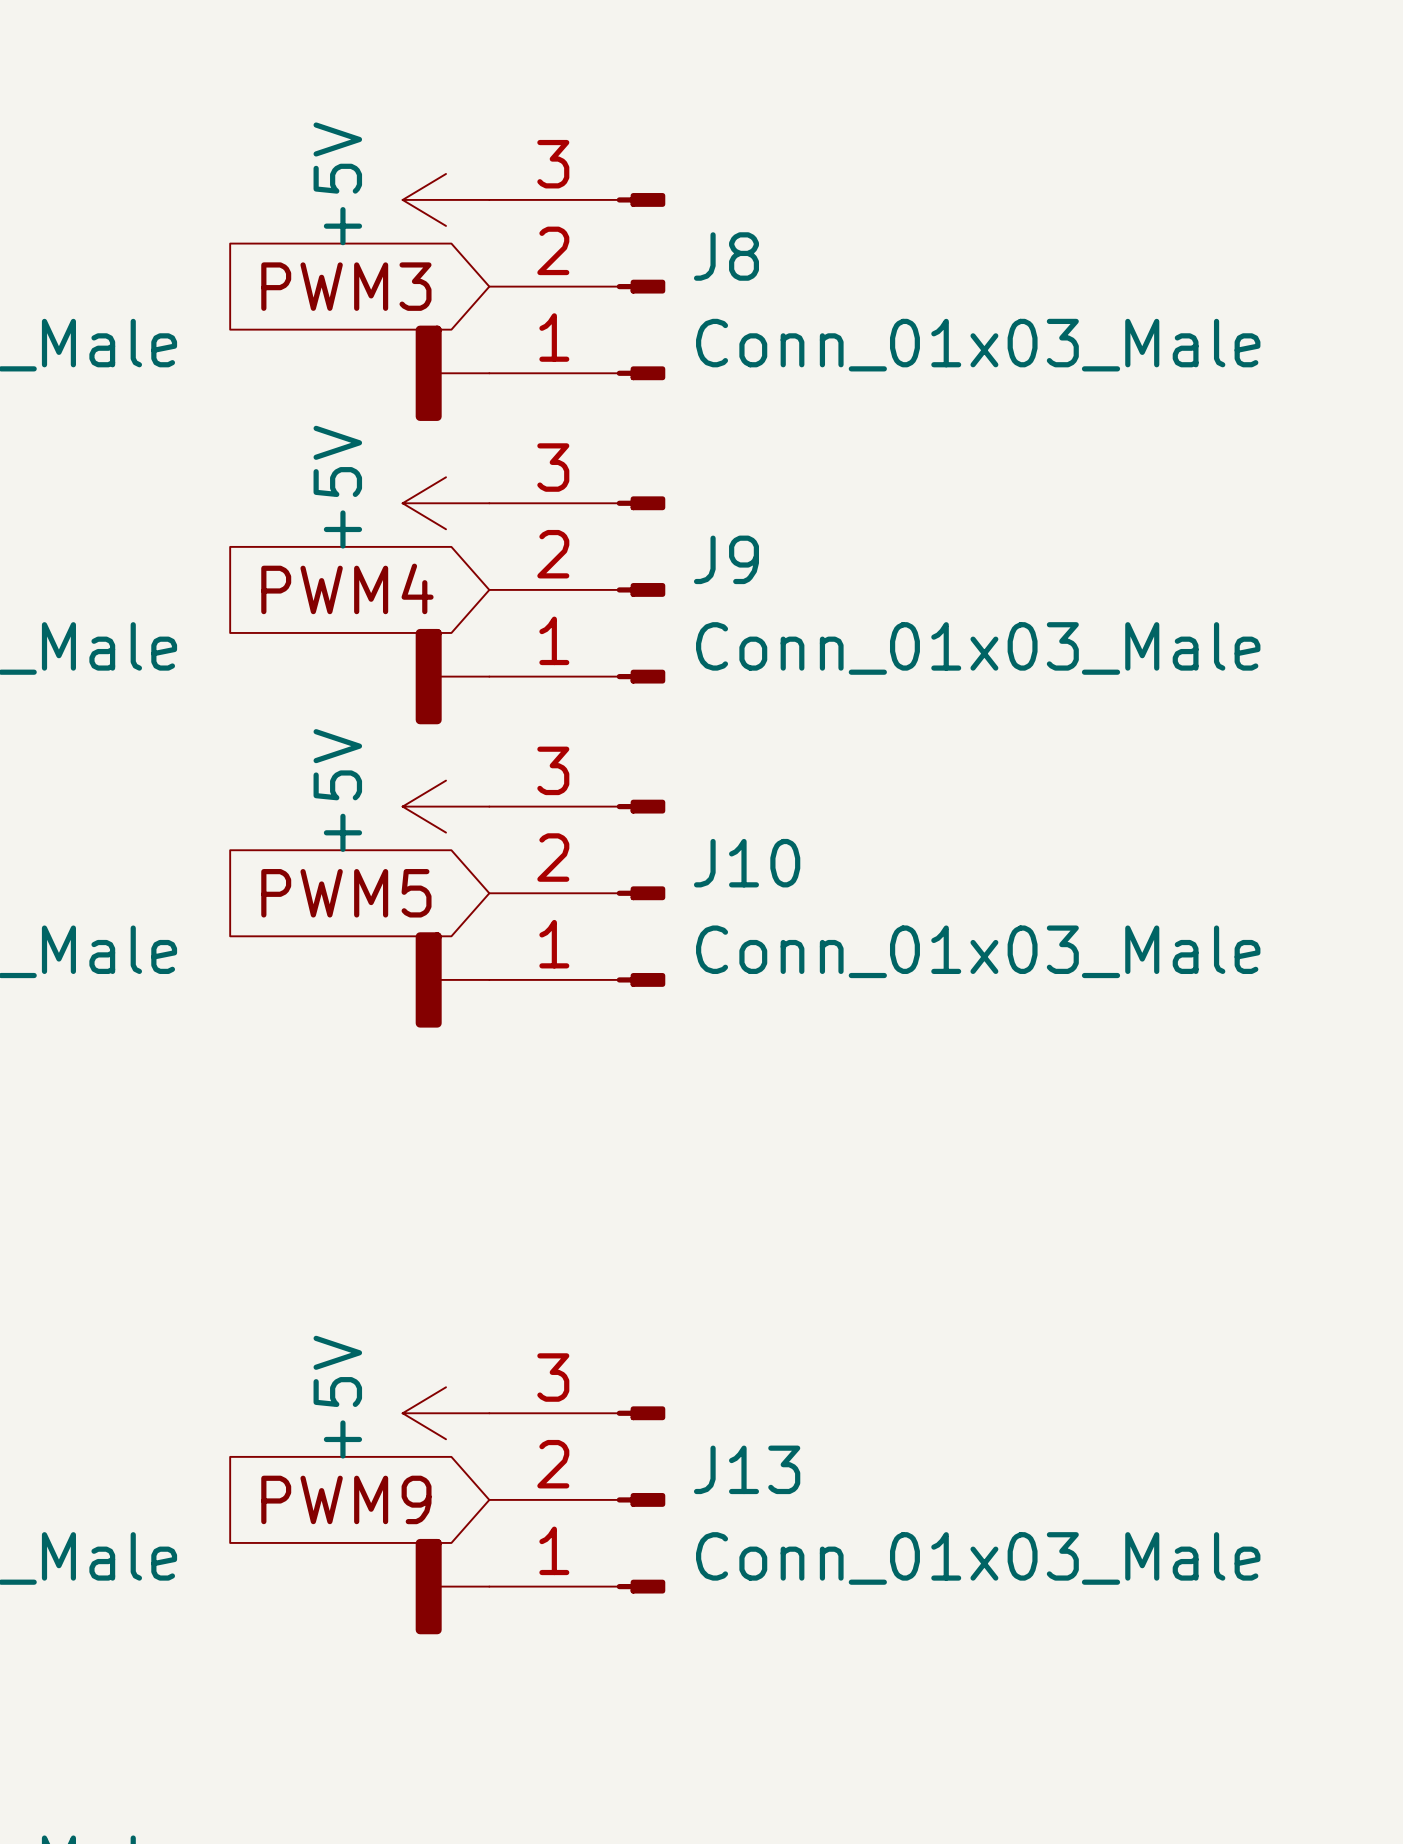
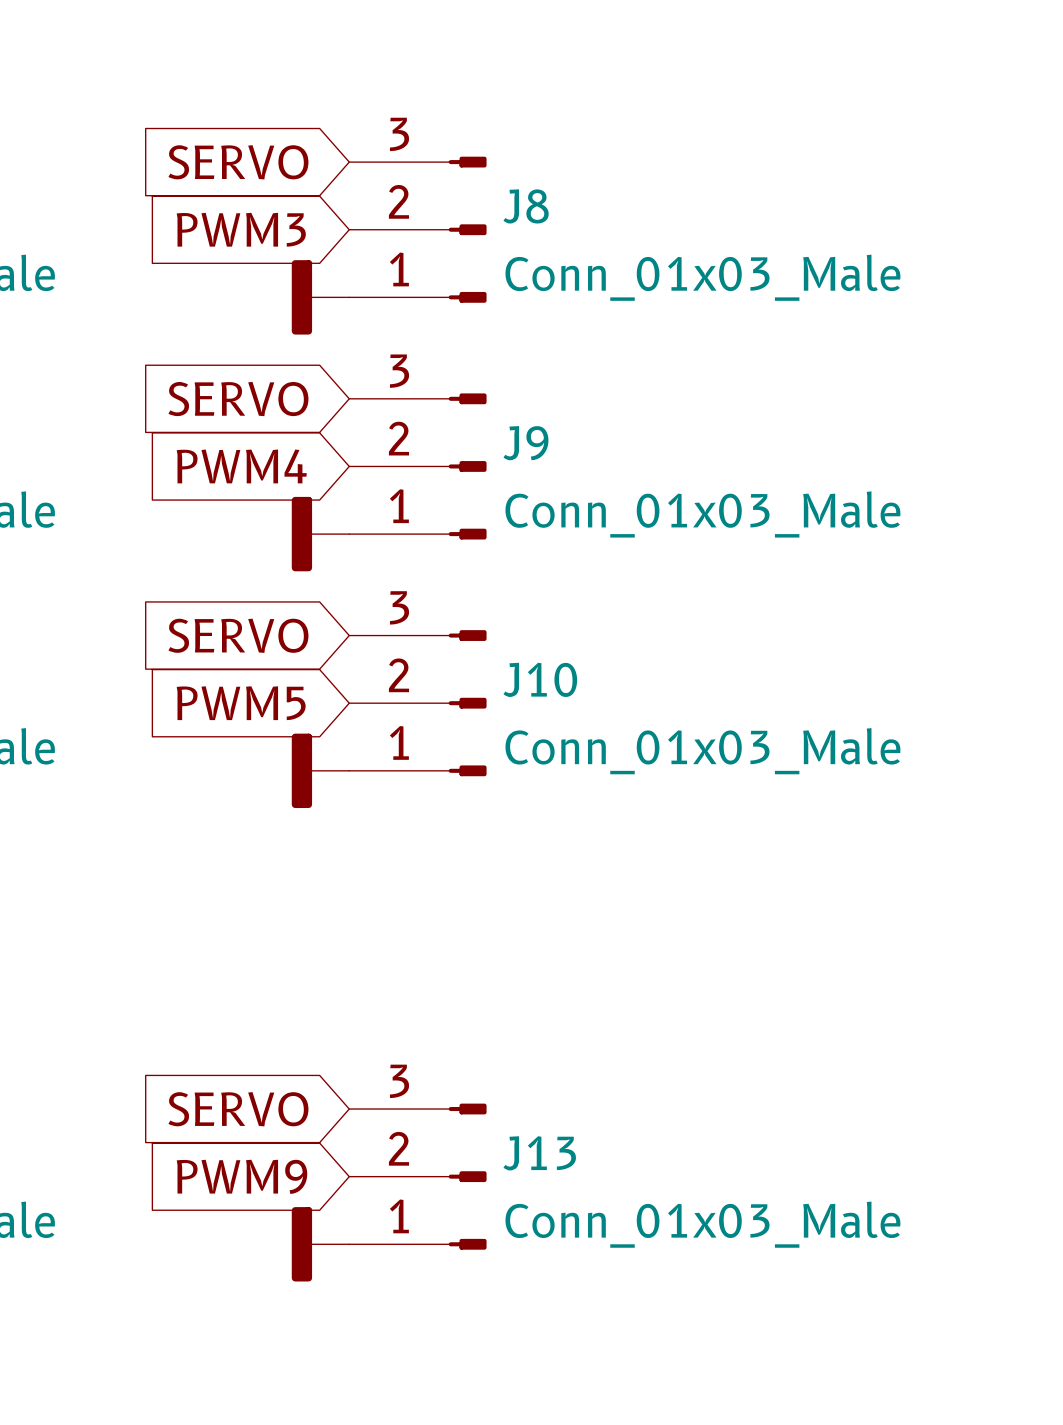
global label: none -> SERVO (238, 162)
power symbol: +5V (446, 199) -> none
global label: none -> SERVO (238, 399)
power symbol: +5V (446, 503) -> none
global label: none -> SERVO (238, 635)
power symbol: +5V (446, 806) -> none
global label: none -> SERVO (238, 1109)
power symbol: +5V (446, 1413) -> none

